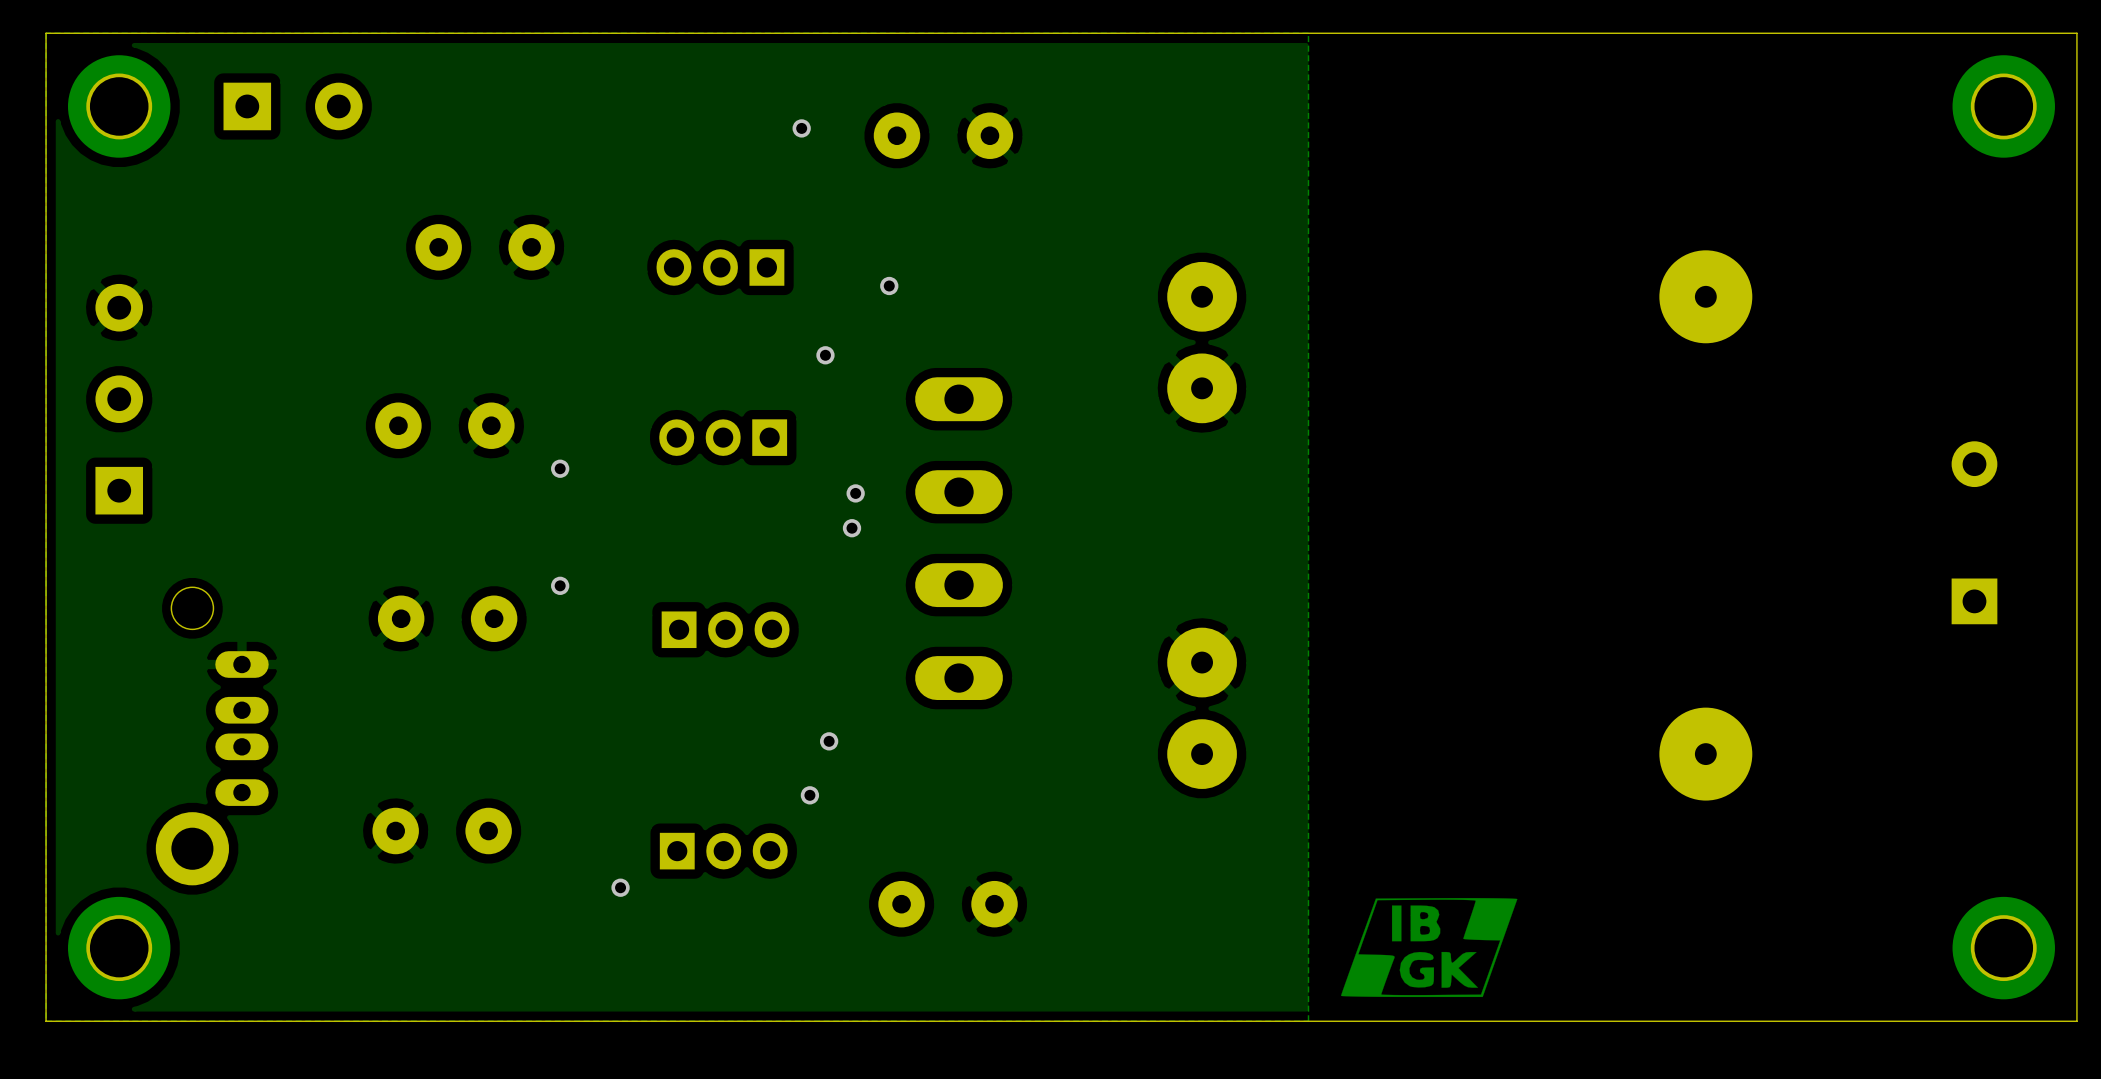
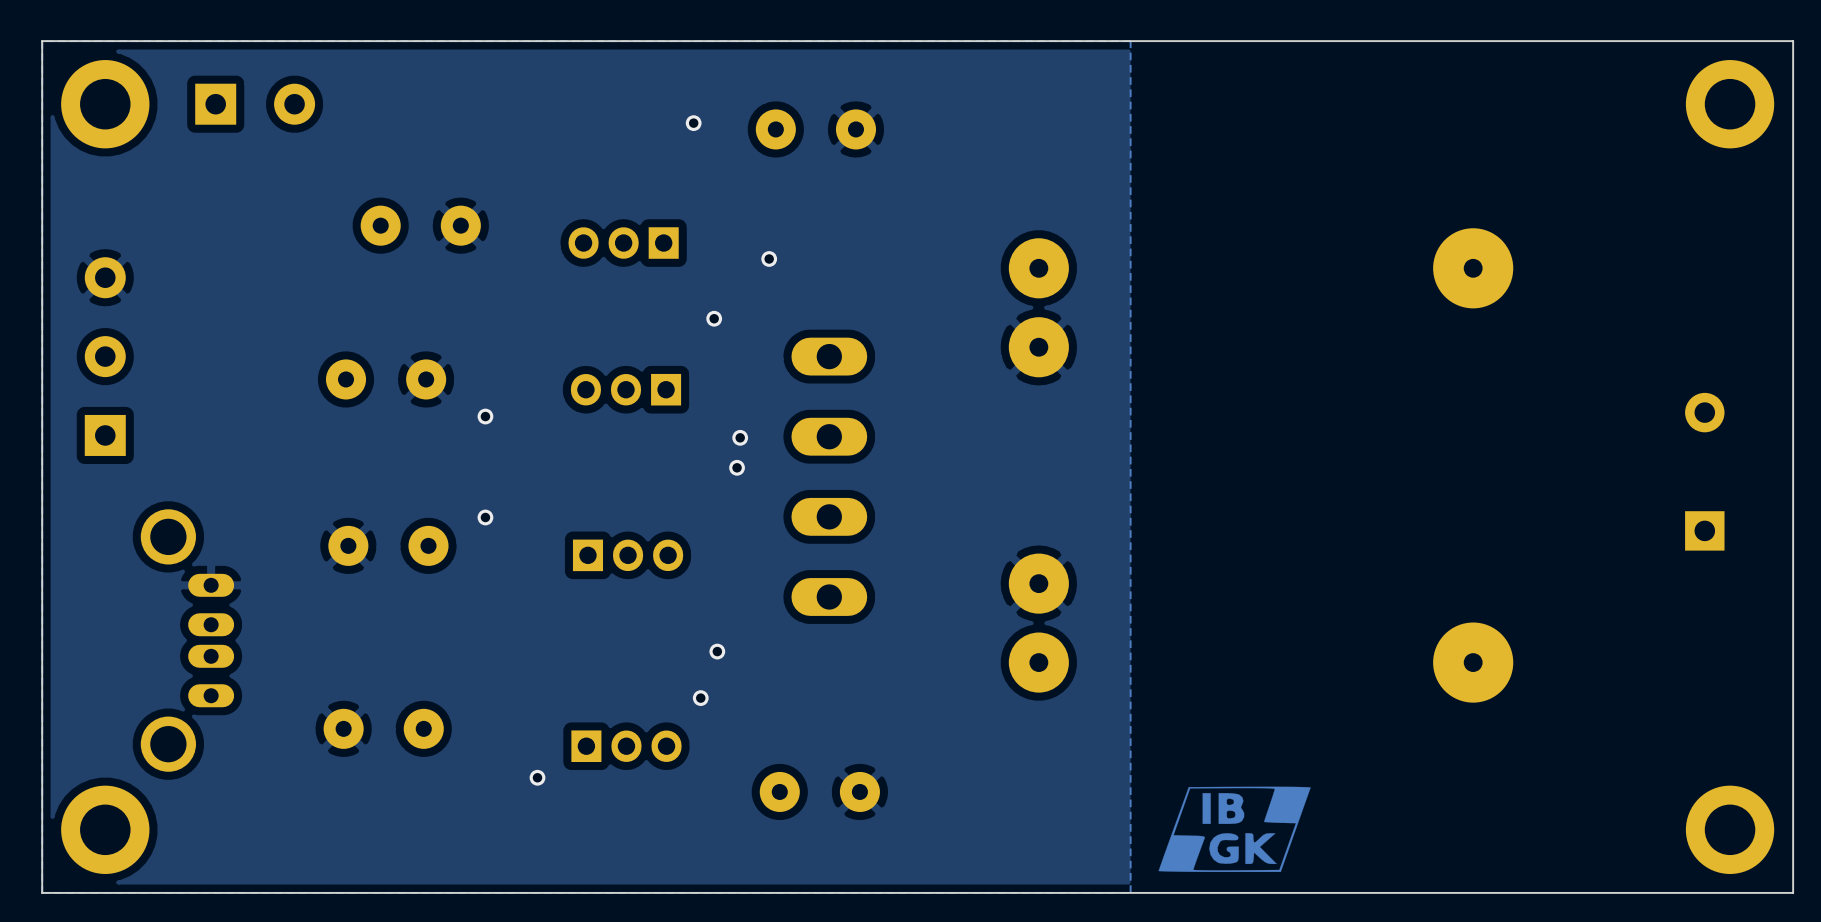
part footprint: [67, 55, 171, 158] -> [61, 60, 150, 149]
part footprint: [1952, 55, 2055, 158] -> [1685, 60, 1775, 149]
part footprint: [155, 587, 269, 886] -> [140, 509, 235, 772]
part footprint: [67, 896, 171, 1000] -> [61, 785, 150, 874]
part footprint: [1952, 896, 2055, 1000] -> [1685, 785, 1775, 874]

